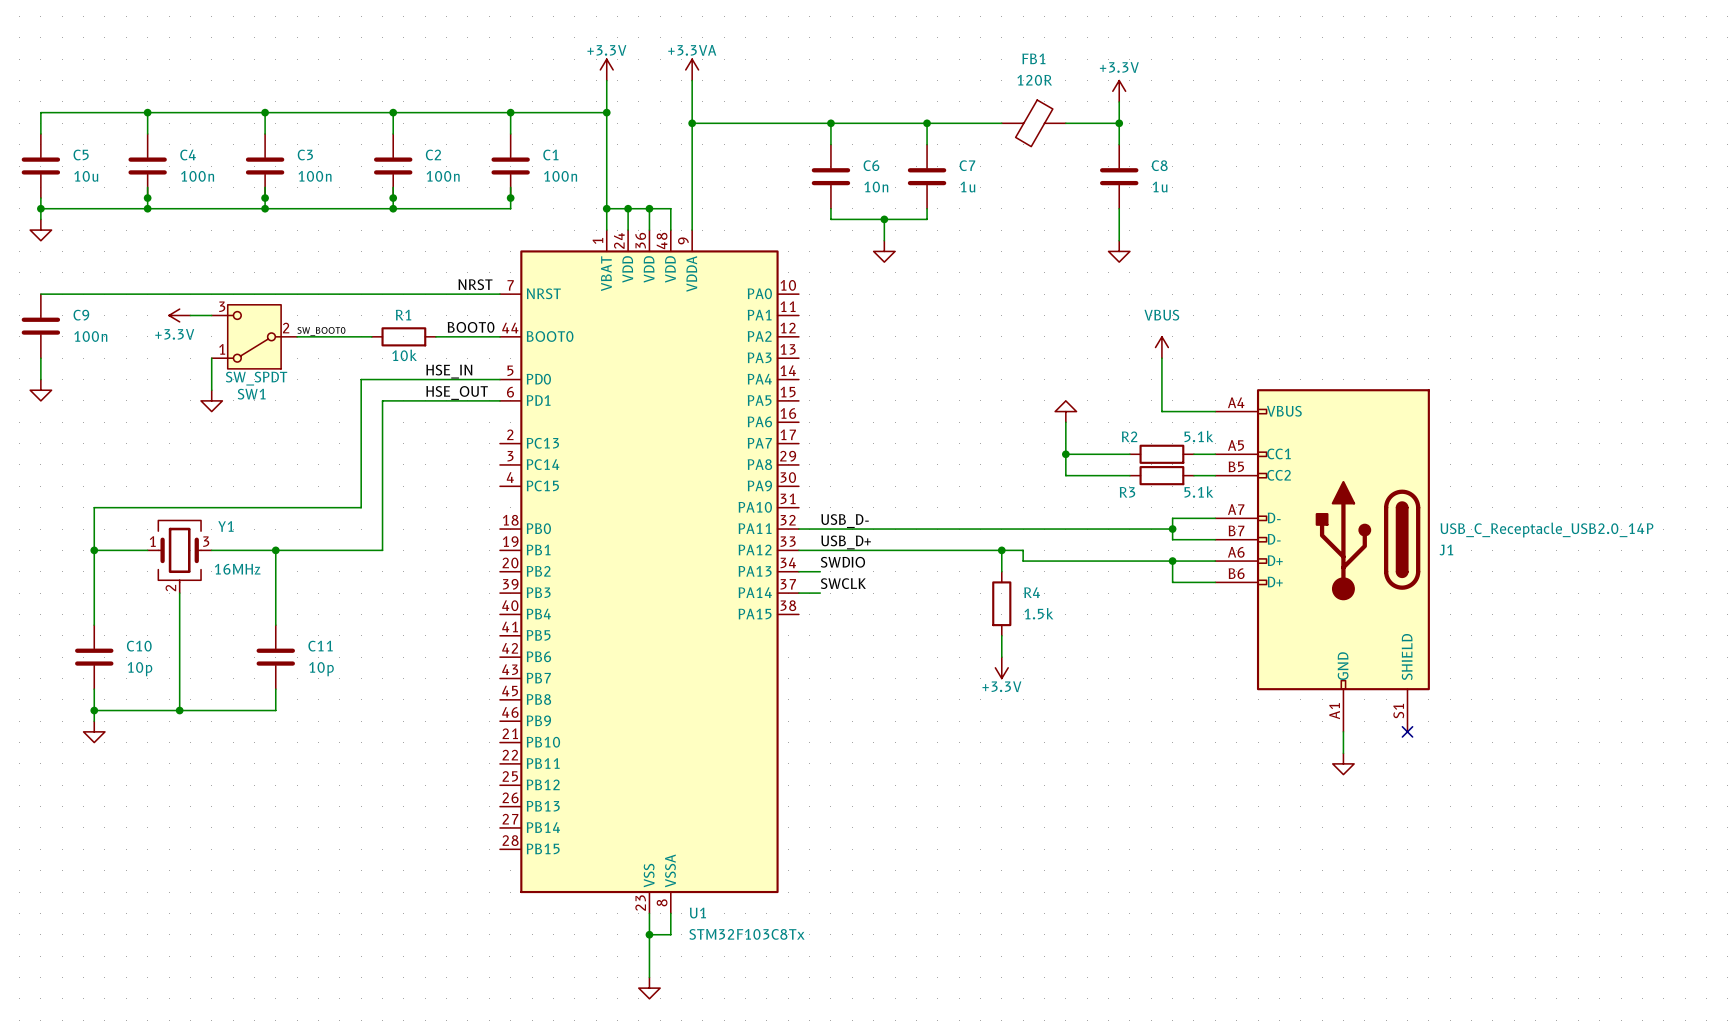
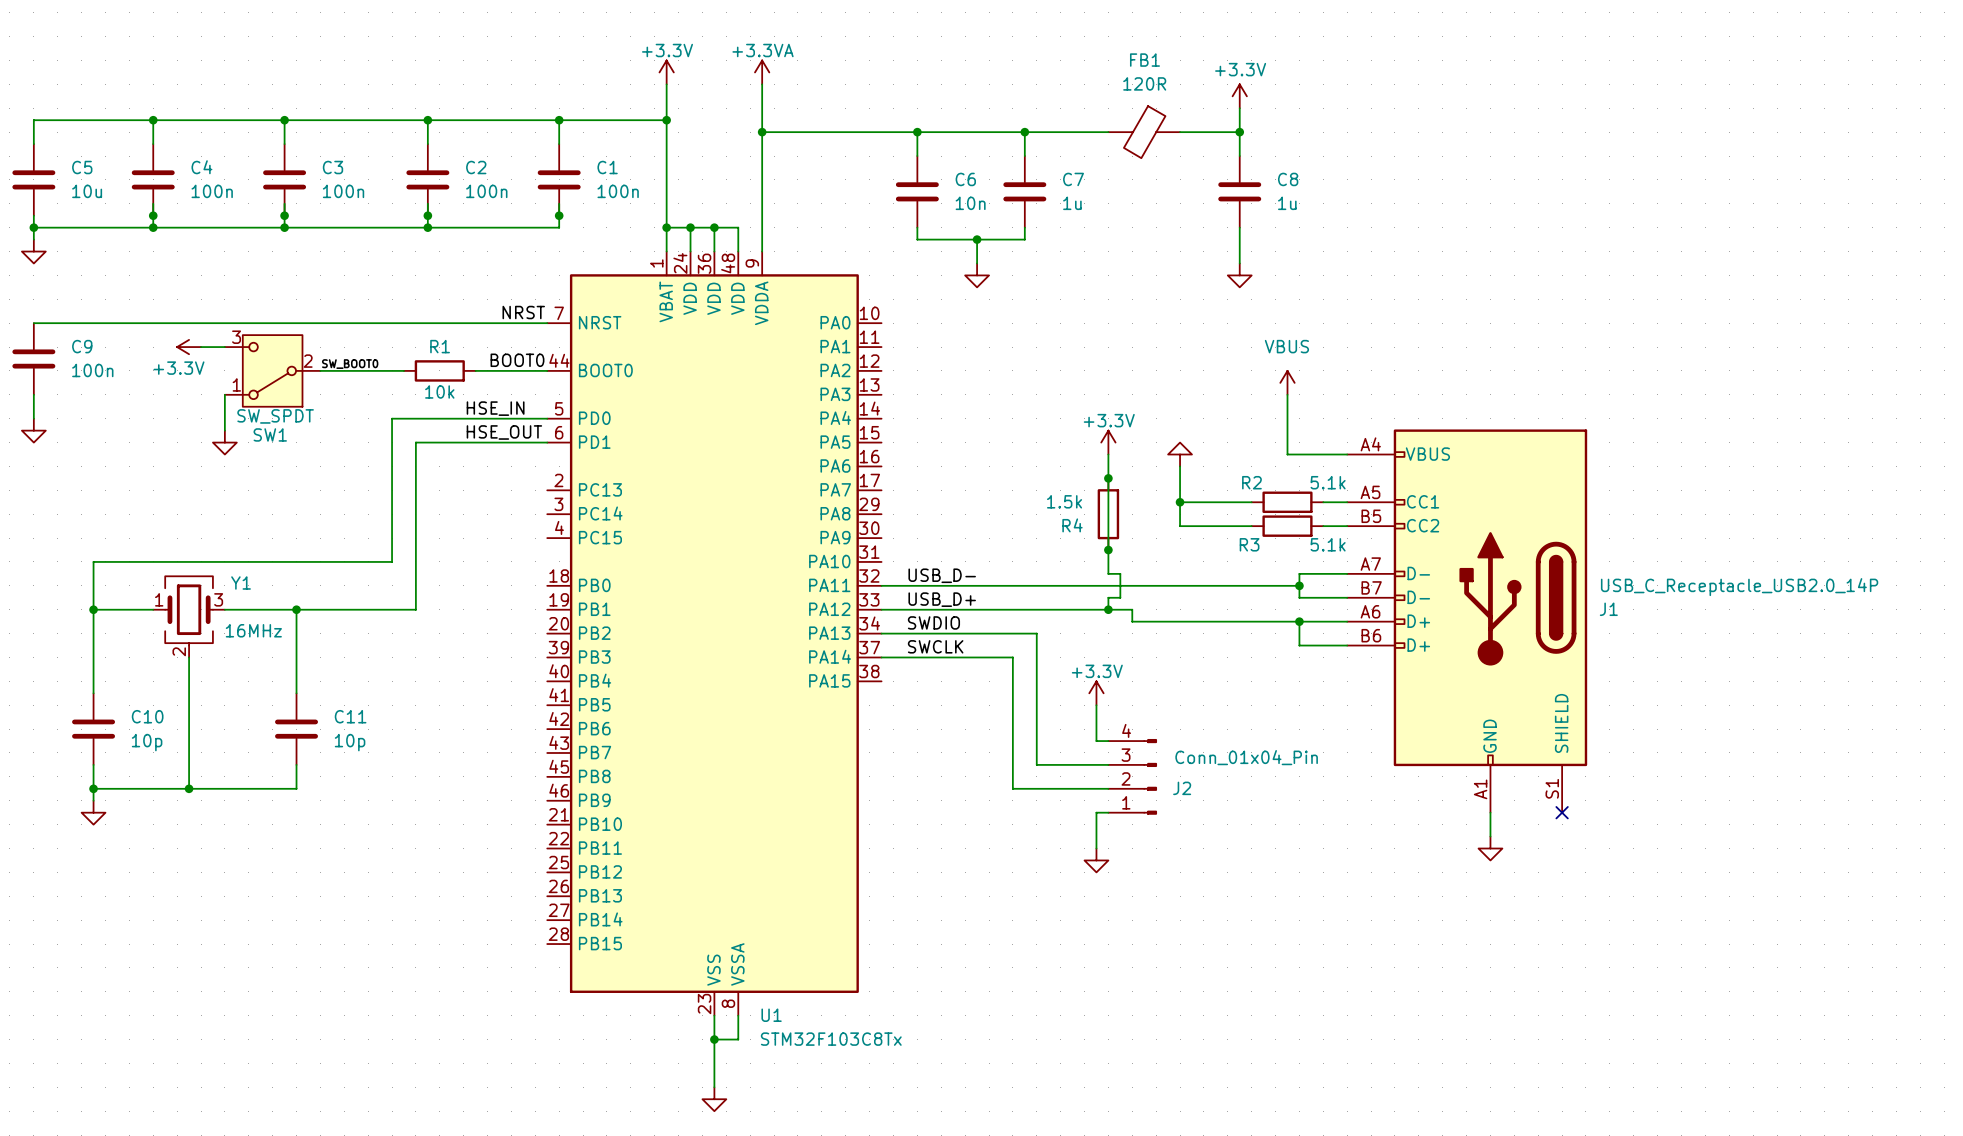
power symbol: none -> +3.3V (1108, 442)
junction: none -> (1108, 478)
junction: none -> (1108, 550)
wire: (1001, 550) (1001, 571) -> (1108, 609) (1108, 597) (1120, 597) (1120, 573) (1108, 573) (1108, 454)
wire: none -> (905, 633) (1036, 633) (1036, 764) (1108, 764)
R4 name position: R4 (1032, 592) -> R4 (1072, 525)
wire: none -> (905, 657) (1012, 657) (1012, 788) (1108, 788)
R4 position: (1001, 603) -> (1108, 514)
R4 value position: 1.5k (1038, 613) -> 1.5k (1064, 501)
wire: none -> (1096, 705) (1096, 741) (1108, 741)
wire: (1001, 635) (1001, 657) -> none
power symbol rotation: 0° (1001, 667) -> 180° (1096, 693)
power symbol position: +3.3V (1001, 667) -> +3.3V (1096, 693)
J2: none -> Conn_01x04_Pin (1132, 776)
wire: none -> (1108, 812) (1096, 812) (1096, 848)
power symbol: none -> (1096, 860)

